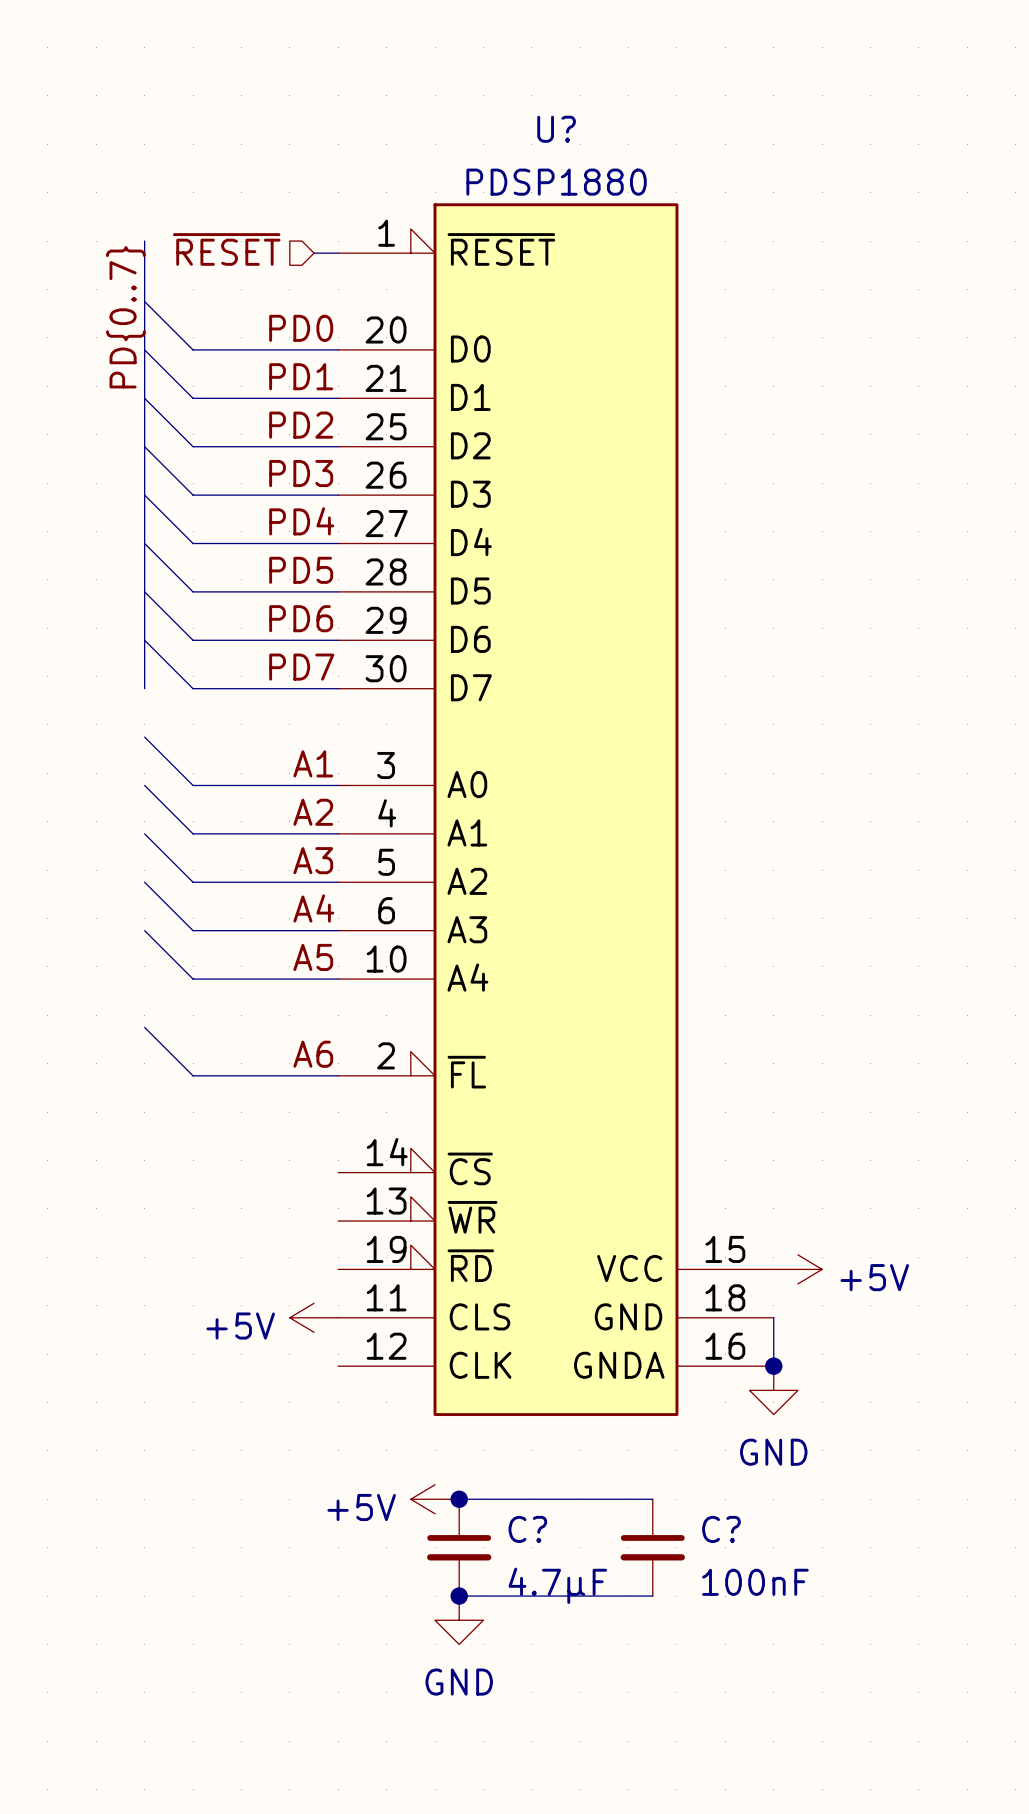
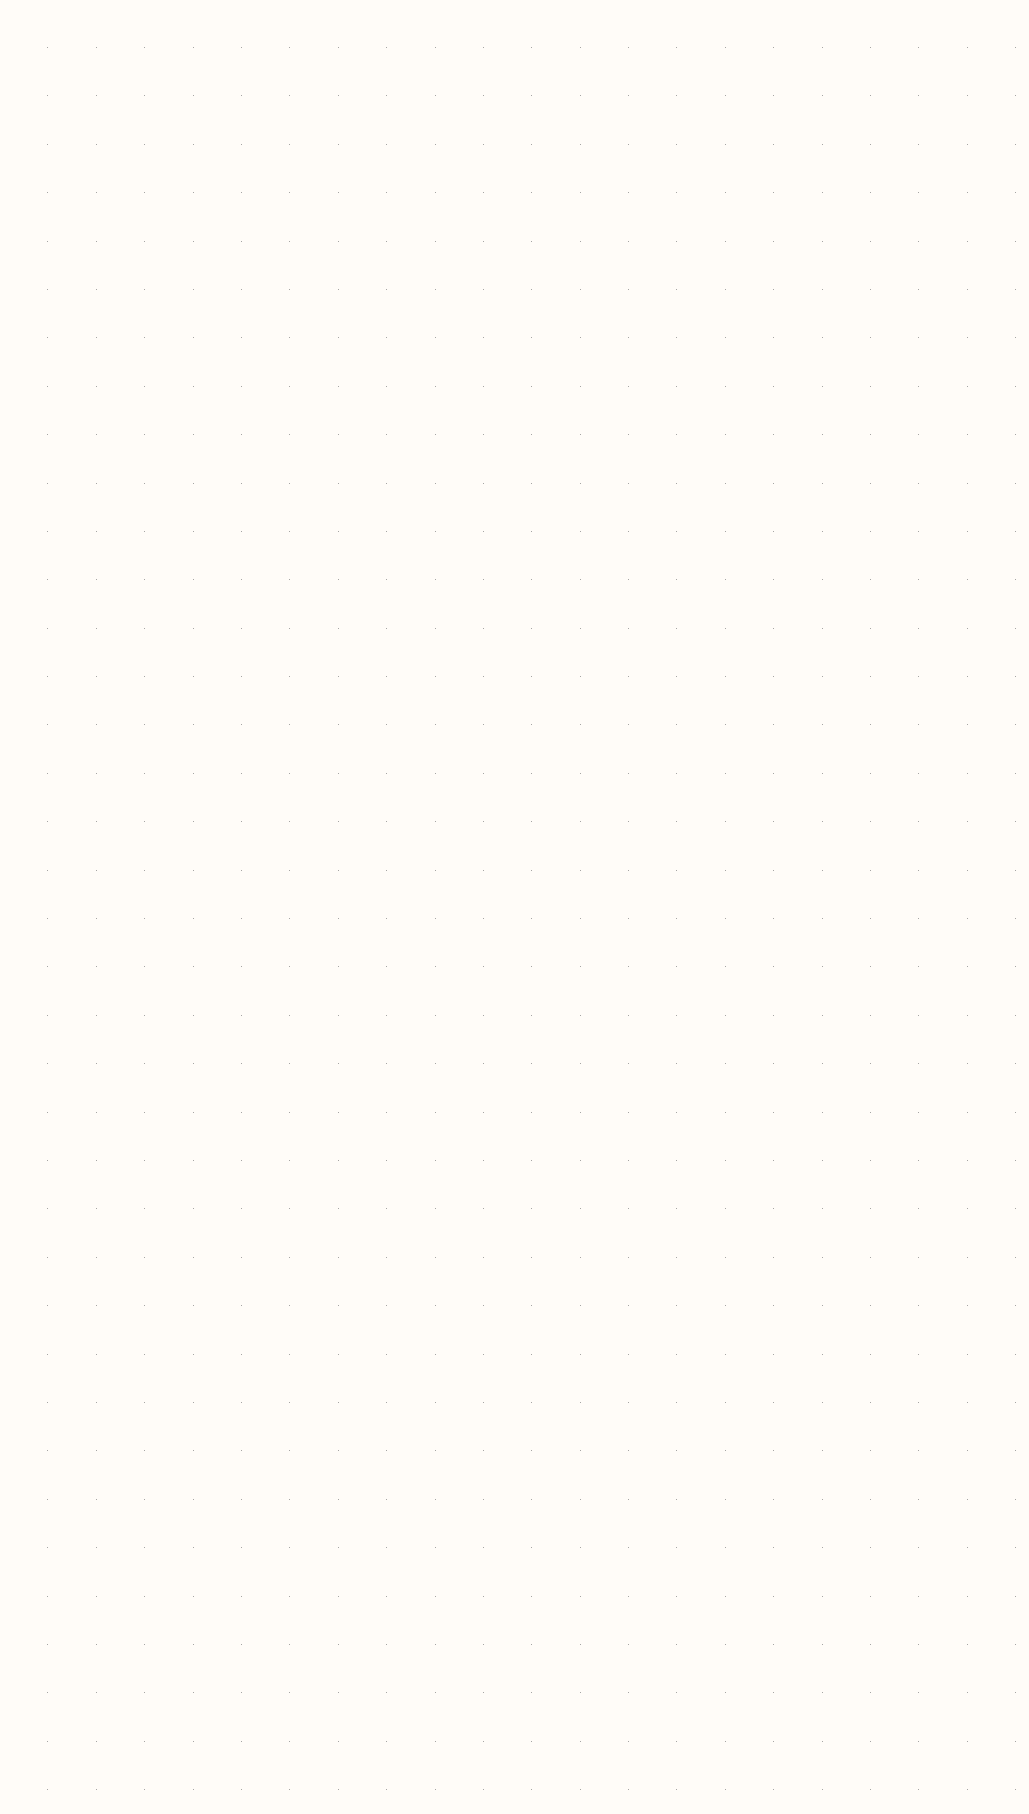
bus: (144, 241) (144, 688) -> none
hierarchical label: ~{RESET} (226, 249) -> none
wire: (314, 253) (338, 253) -> none
wire: (144, 301) (193, 349) (338, 349) -> none
label: PD{0..7} (125, 317) -> none
label: PD0 (301, 328) -> none
wire: (144, 349) (193, 398) (338, 398) -> none
label: PD1 (301, 376) -> none
wire: (144, 398) (193, 446) (338, 446) -> none
label: PD2 (301, 425) -> none
wire: (144, 446) (193, 495) (338, 495) -> none
label: PD3 (301, 473) -> none
wire: (144, 495) (193, 543) (338, 543) -> none
label: PD4 (301, 521) -> none
wire: (144, 543) (193, 591) (338, 591) -> none
label: PD5 (301, 570) -> none
wire: (144, 591) (193, 640) (338, 640) -> none
label: PD6 (301, 618) -> none
wire: (144, 640) (193, 688) (338, 688) -> none
label: PD7 (301, 667) -> none
wire: (144, 737) (193, 785) (338, 785) -> none
label: A1 (313, 763) -> none
wire: (144, 785) (193, 833) (338, 833) -> none
U?: PDSP1880 (555, 809) -> none
label: A2 (313, 812) -> none
wire: (144, 833) (193, 882) (338, 882) -> none
label: A3 (313, 860) -> none
wire: (144, 882) (193, 930) -> none
label: A4 (313, 908) -> none
wire: (144, 930) (193, 979) (338, 979) -> none
wire: (193, 930) (338, 930) -> none
label: A5 (313, 957) -> none
wire: (144, 1027) (193, 1075) -> none
label: A6 (313, 1054) -> none
wire: (193, 1075) (338, 1075) -> none
power symbol: +5V (797, 1269) -> none
power symbol: +5V (314, 1317) -> none
wire: (773, 1317) (773, 1366) -> none
junction: (773, 1366) -> none
power symbol: GND (773, 1390) -> none
power symbol: +5V (435, 1499) -> none
wire: (459, 1499) (652, 1499) -> none
junction: (459, 1499) -> none
C?: 4.7µF (459, 1547) -> none
C?: 100nF (652, 1547) -> none
wire: (459, 1596) (652, 1596) -> none
junction: (459, 1596) -> none
power symbol: GND (459, 1620) -> none

